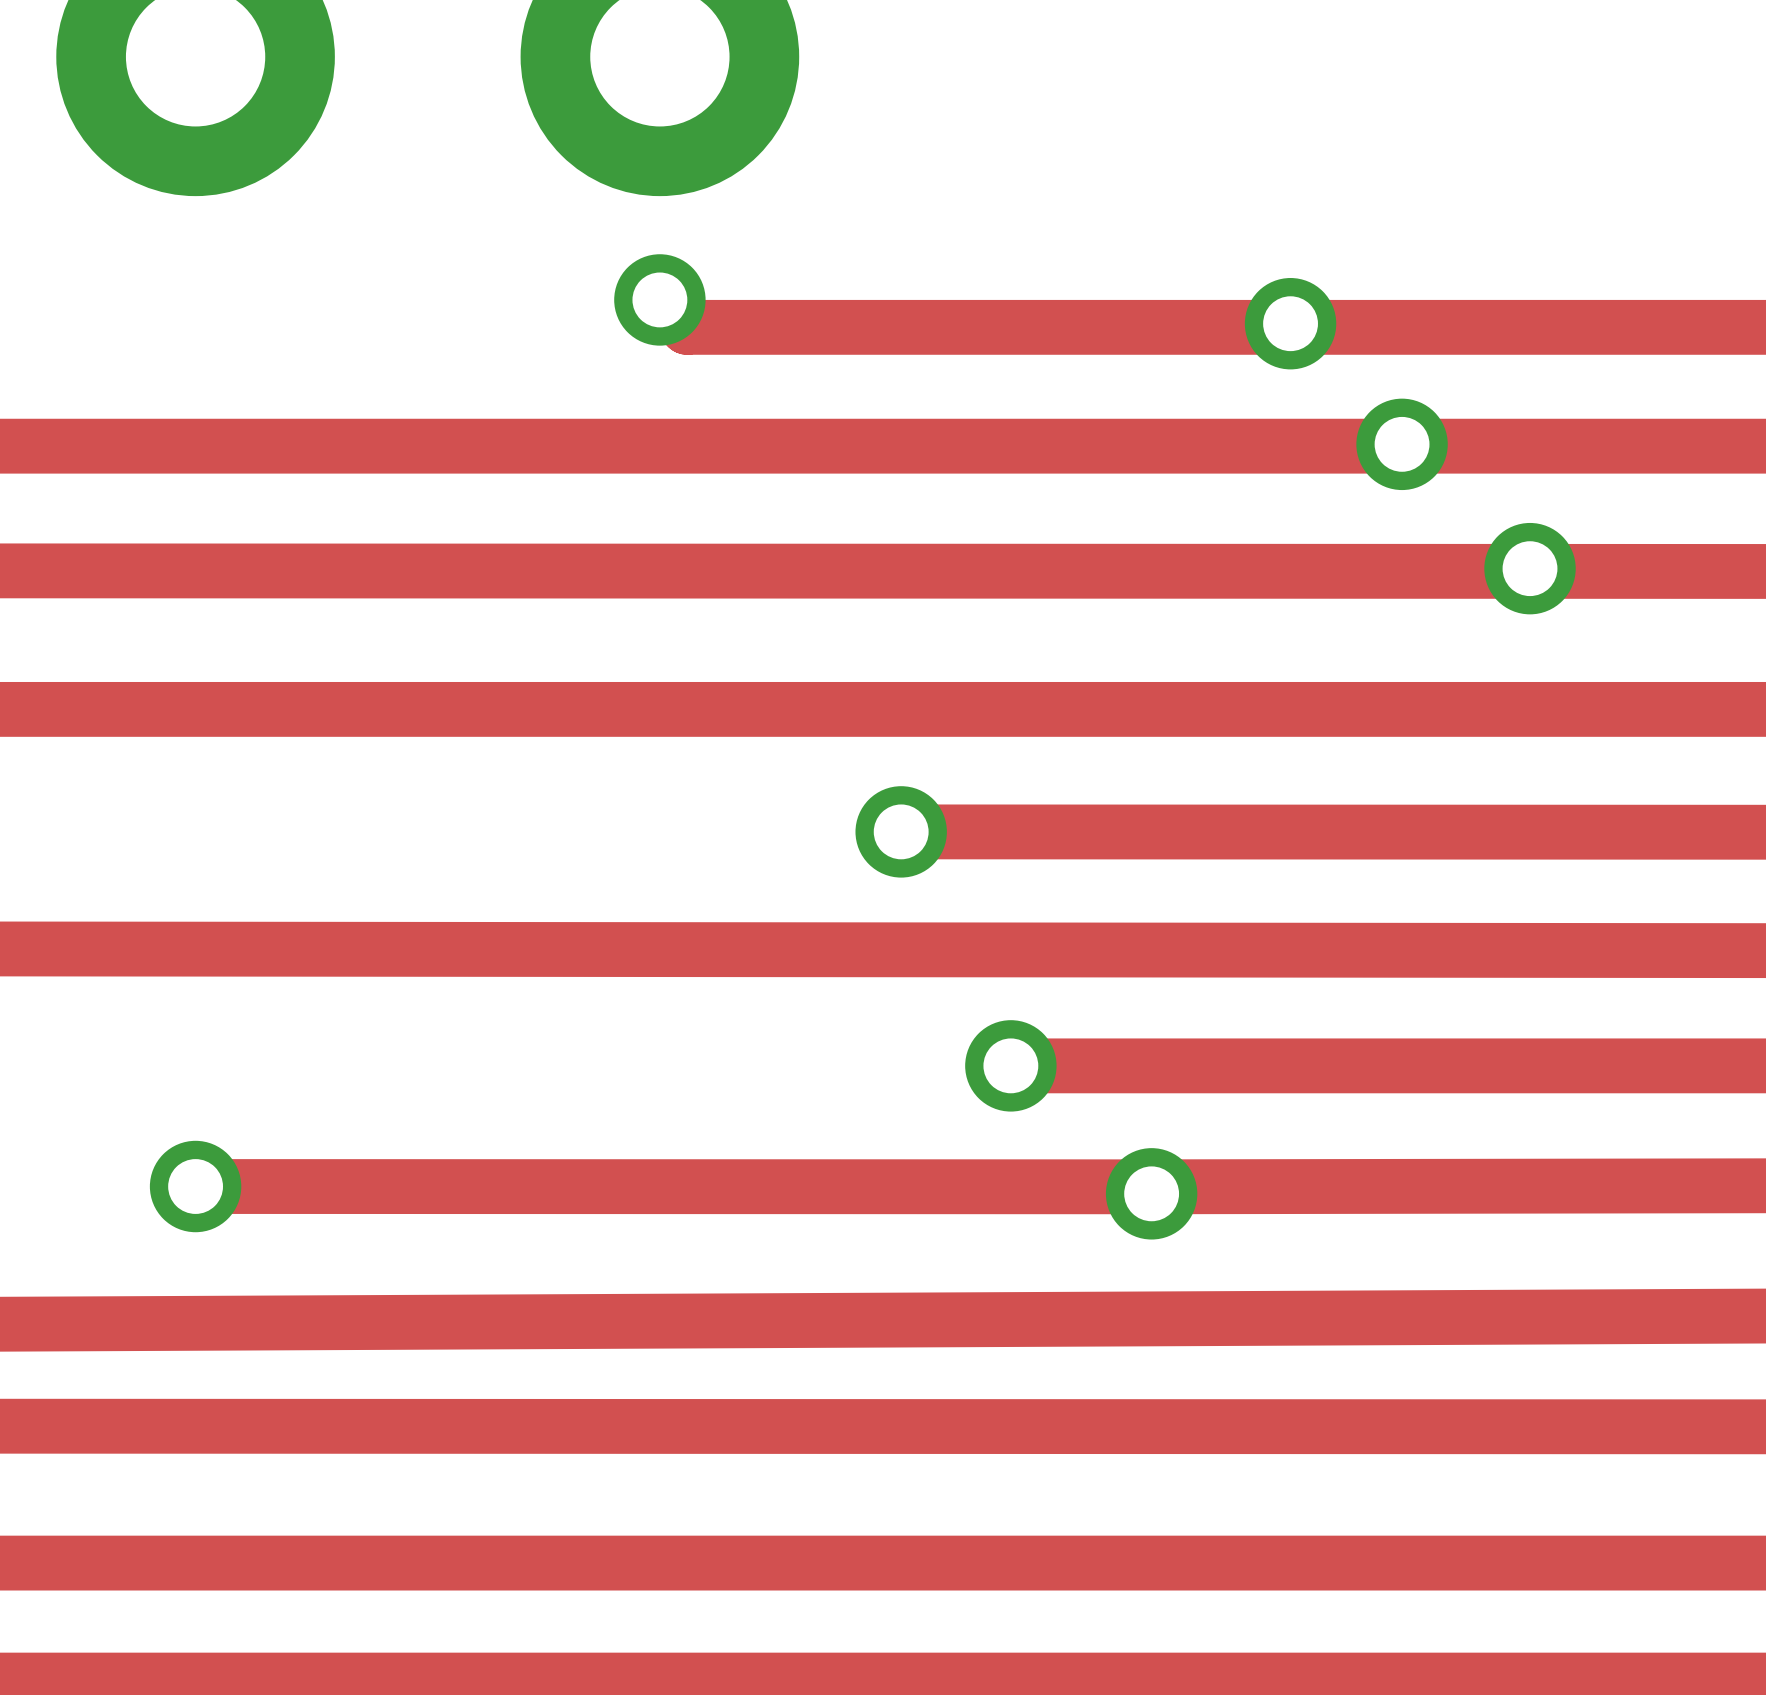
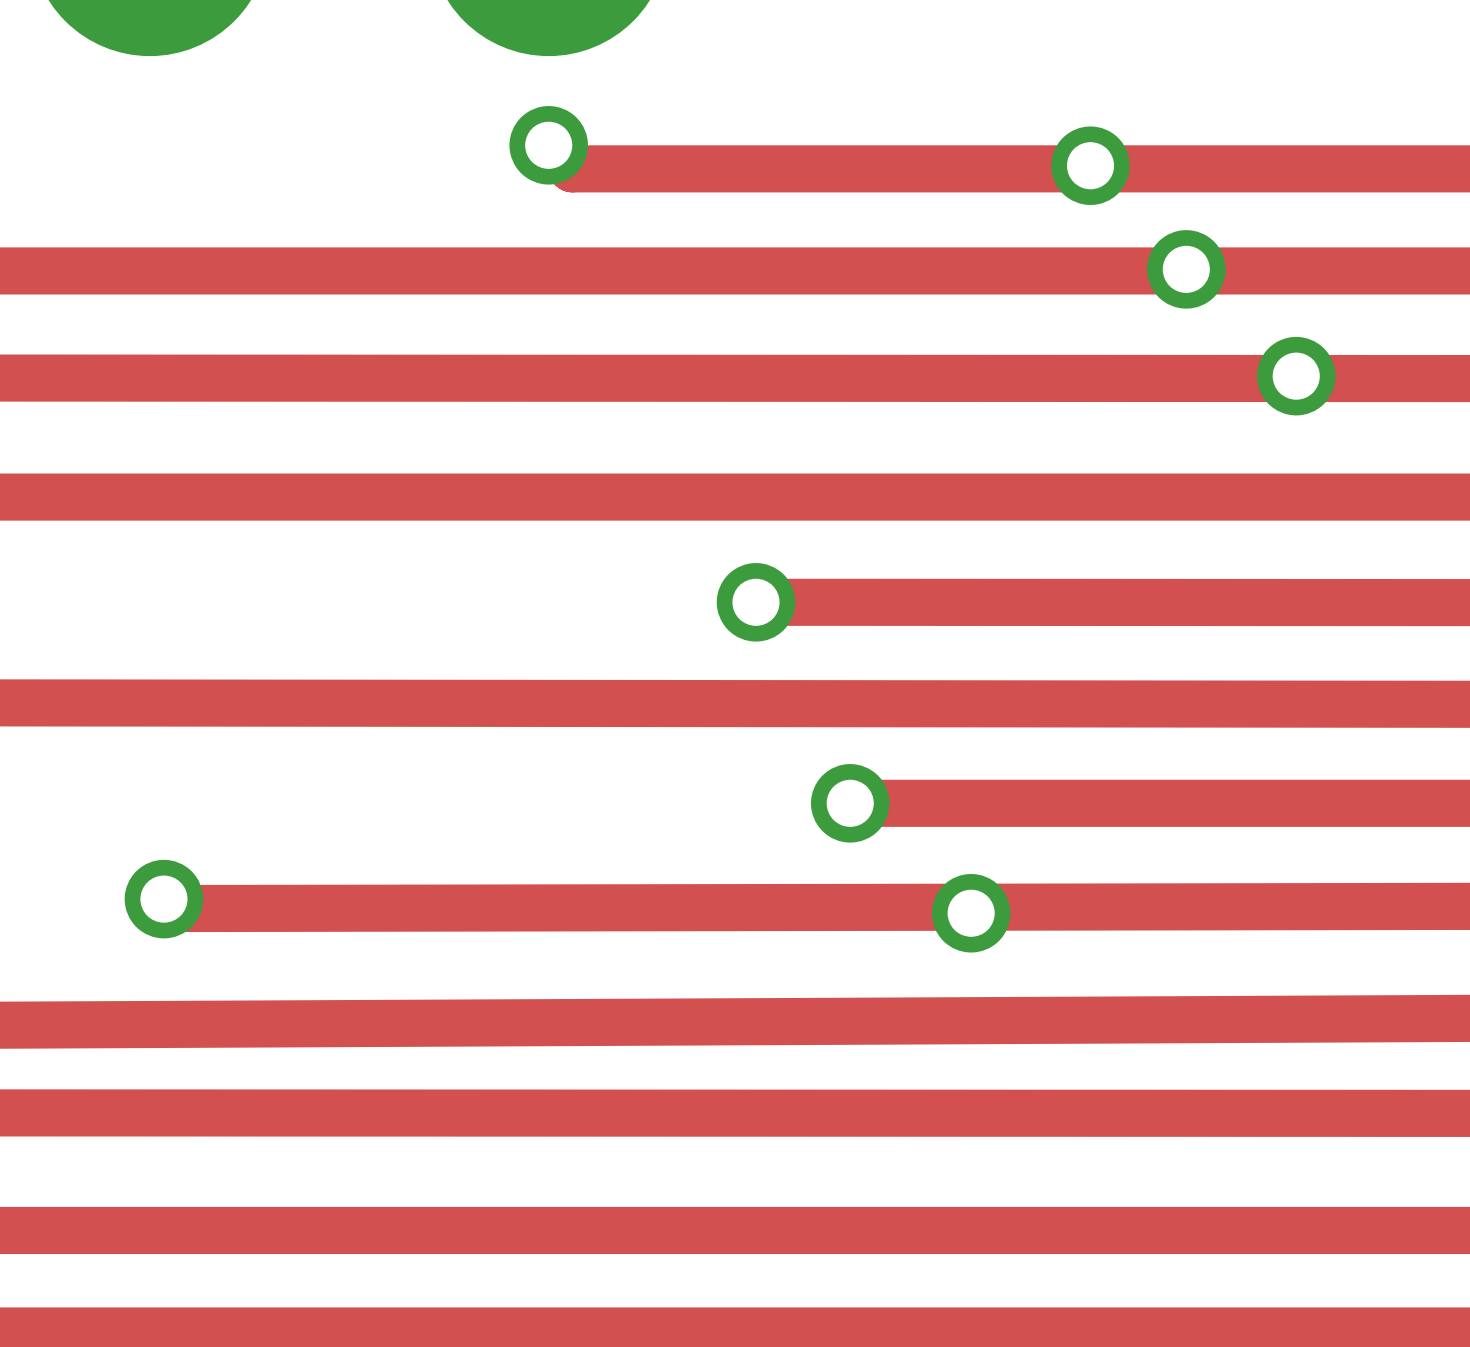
track: (195, 1186) (1149, 1186) -> (163, 899) (173, 908) (969, 907)
via position: (195, 1186) -> (163, 899)

